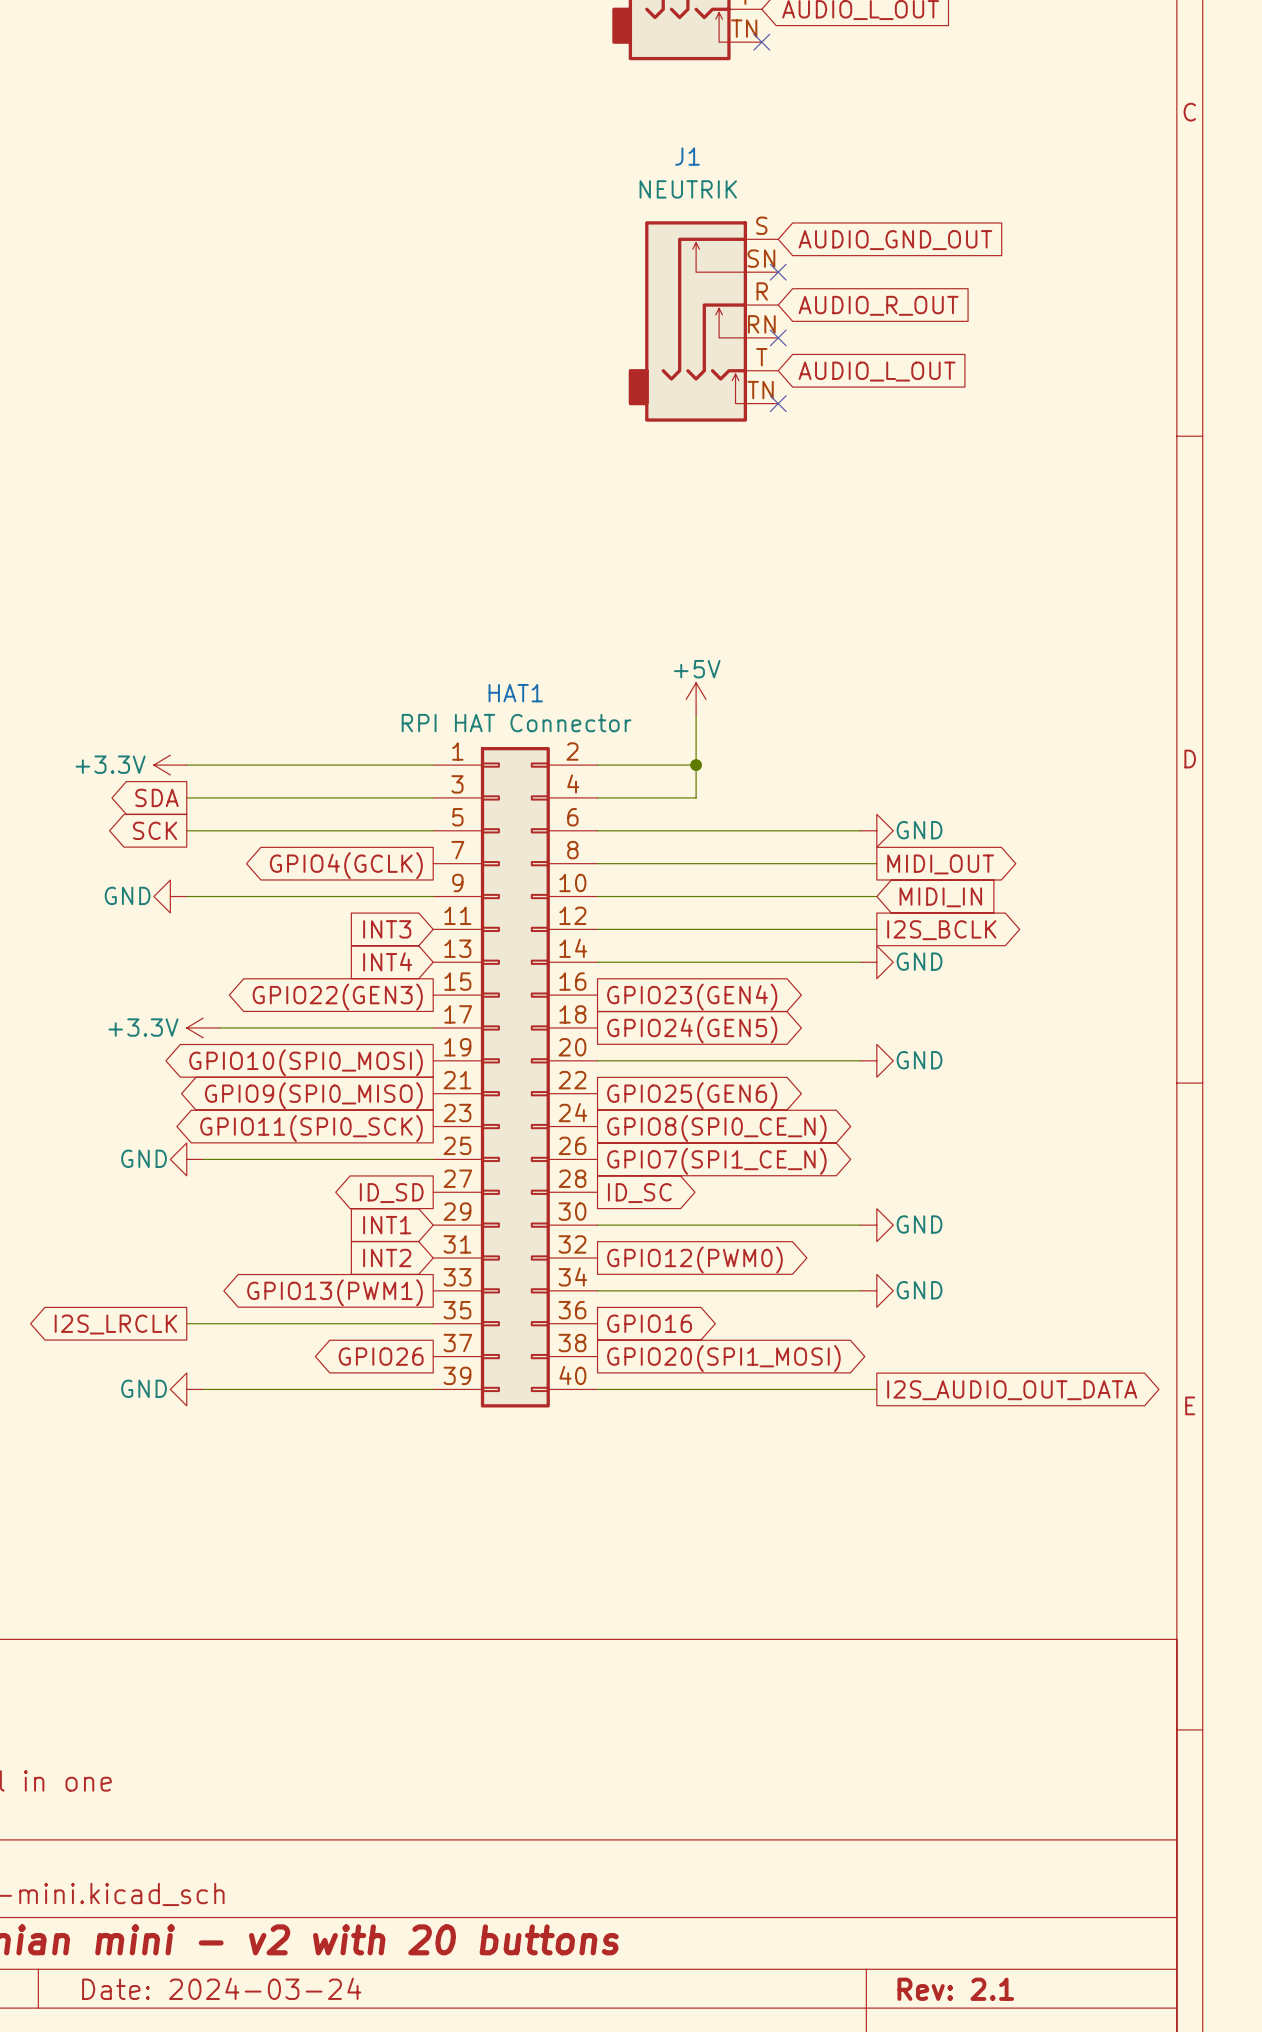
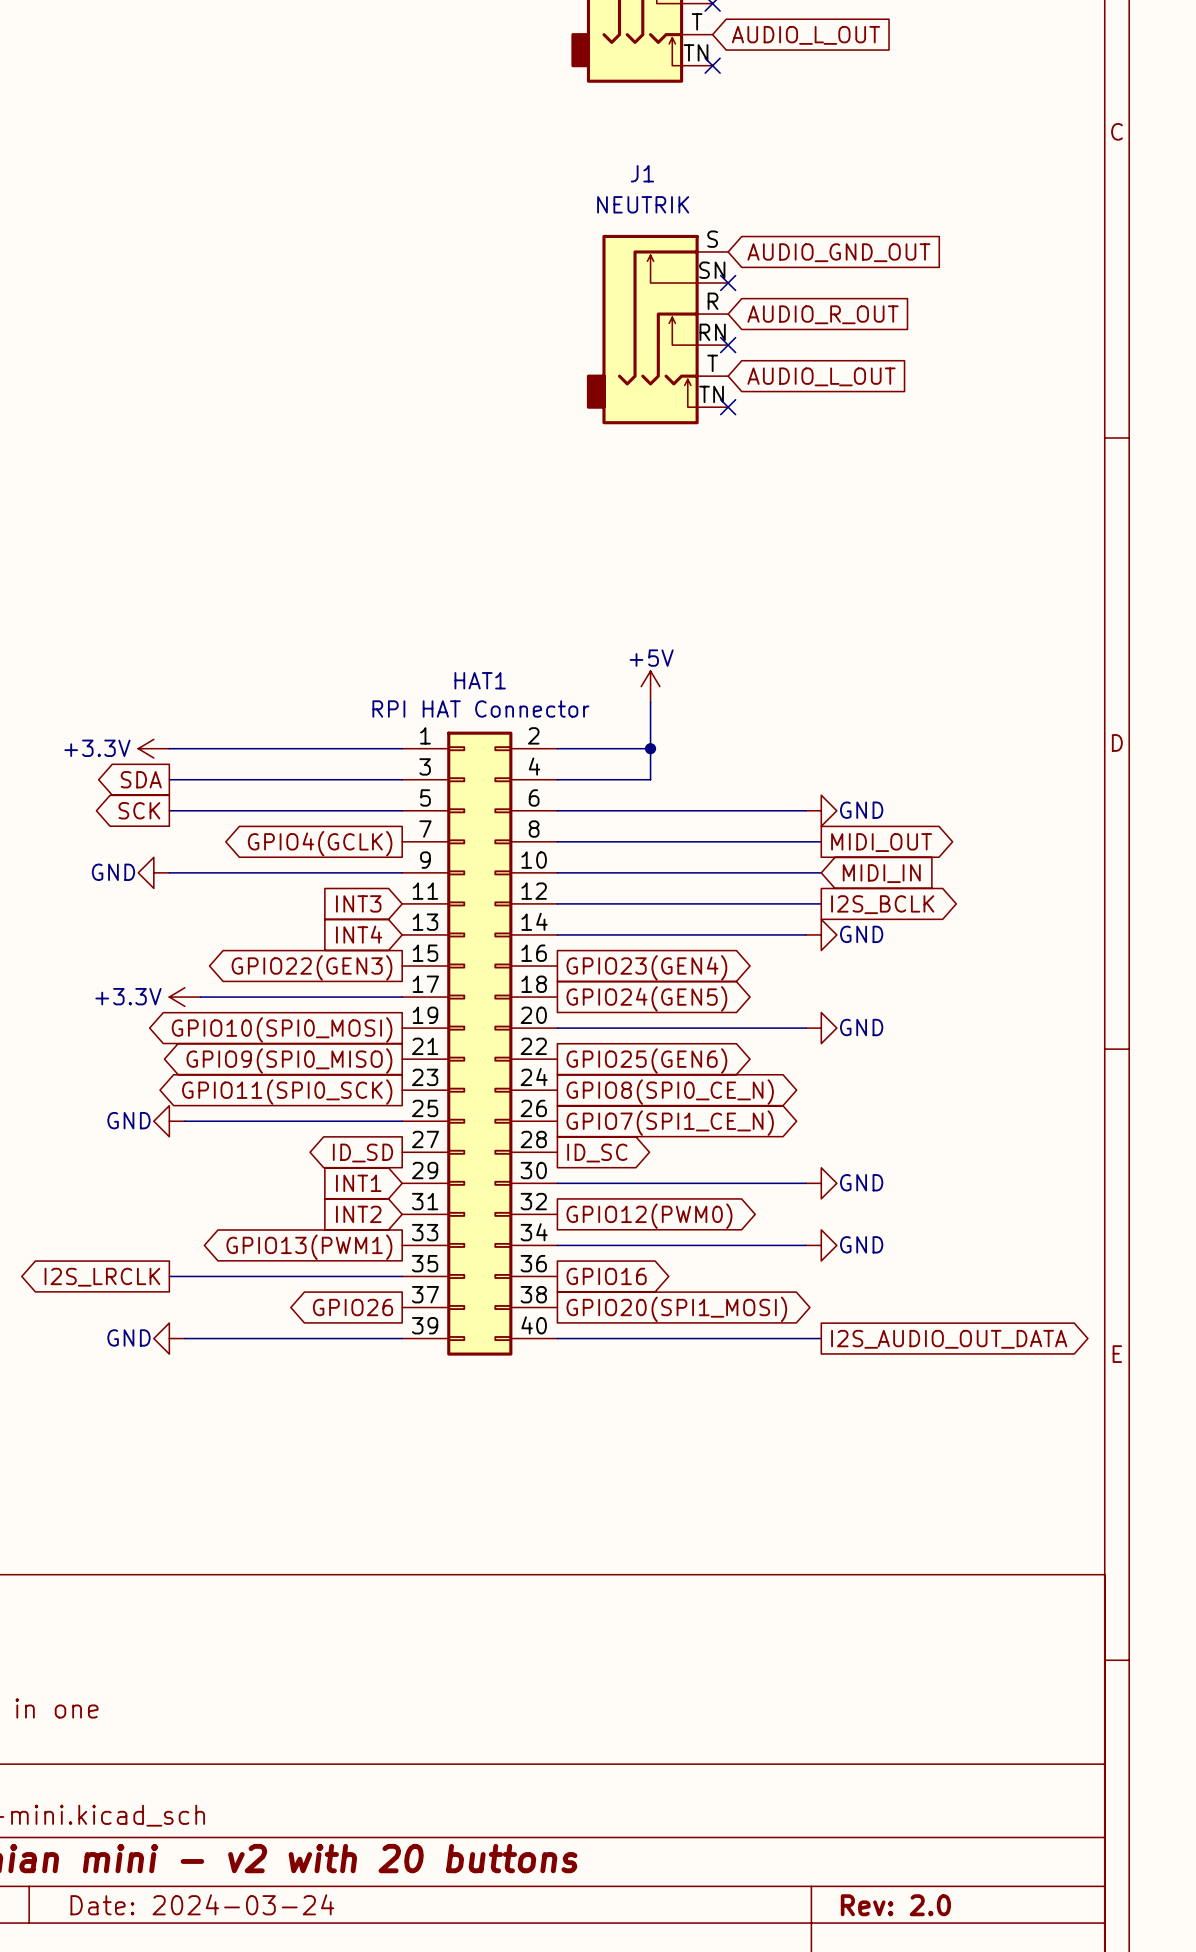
title block: Rev: 2.1 (955, 1989) -> Rev: 2.0 (895, 1905)

